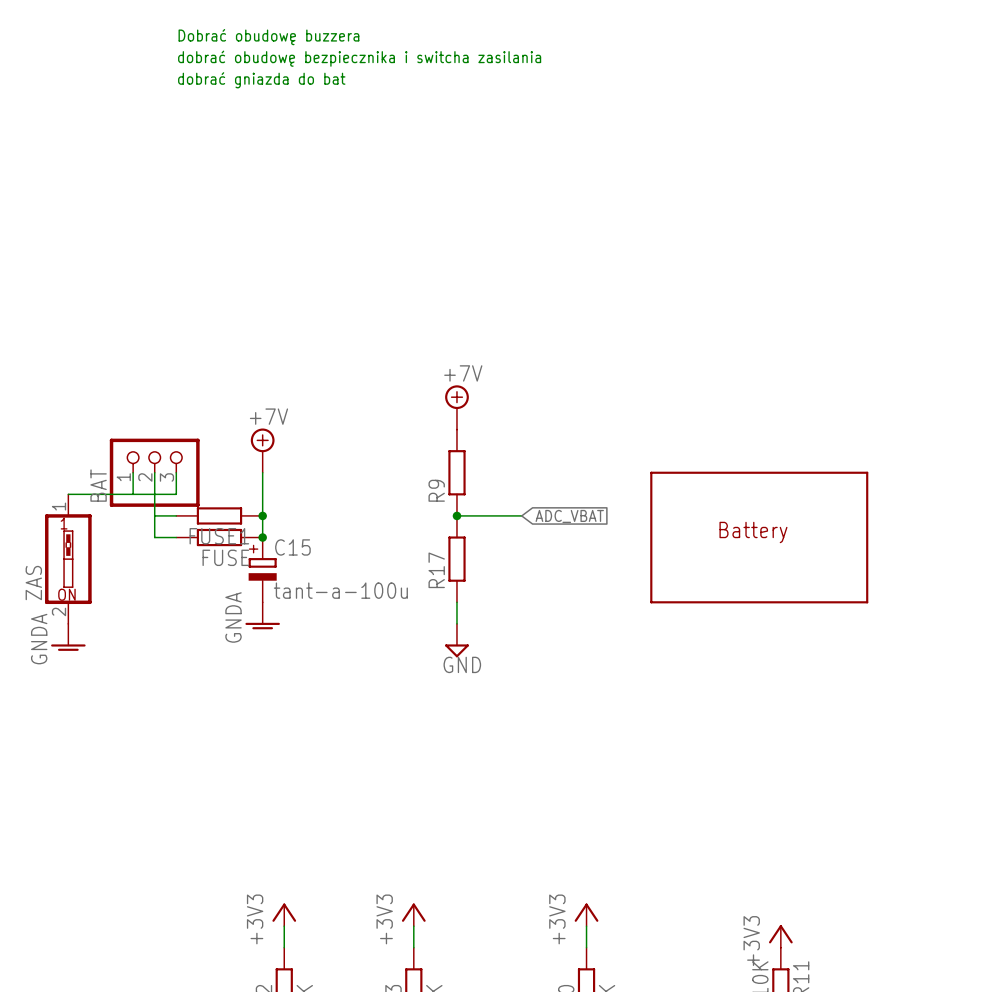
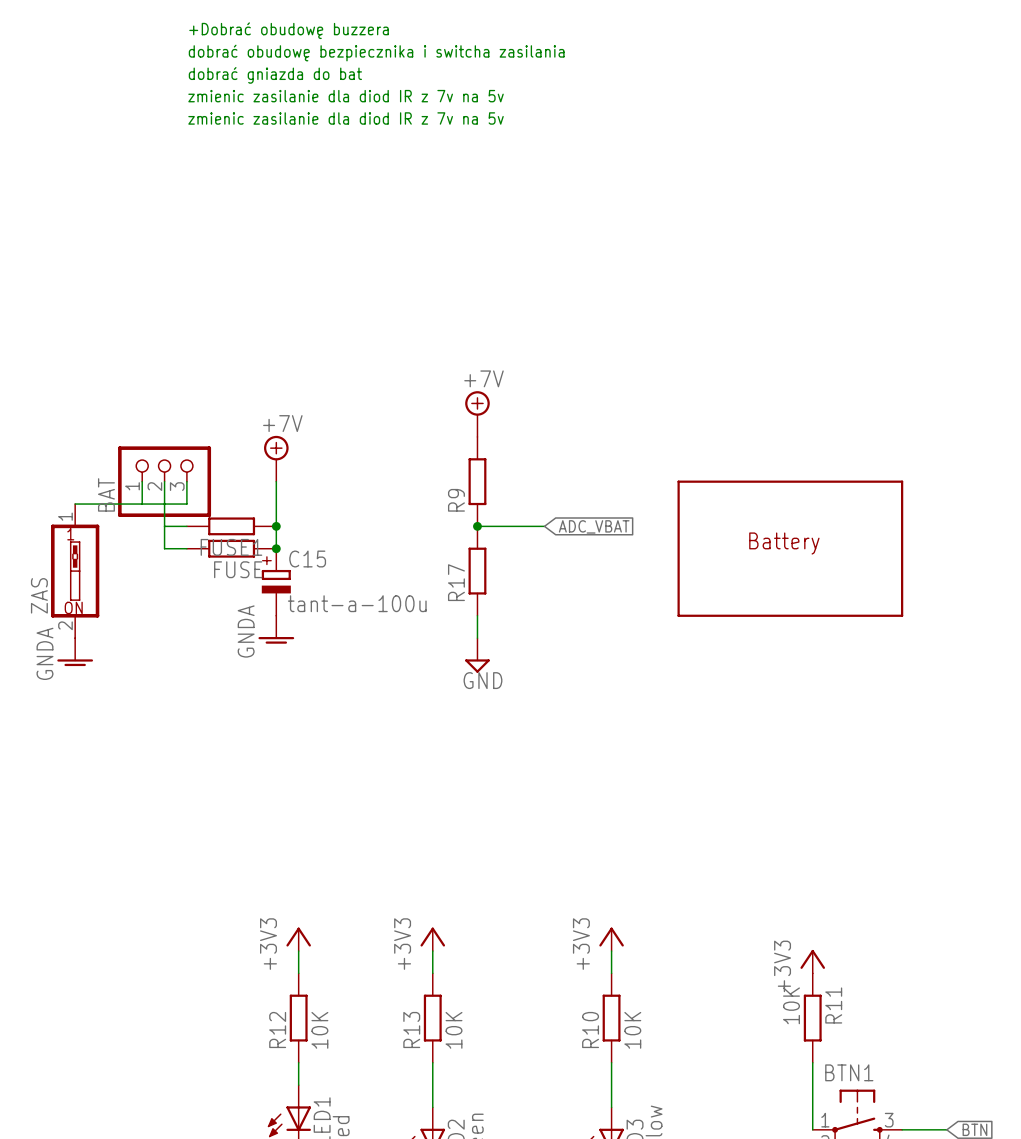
text: Dobrać obudowę buzzera (268, 37) -> +Dobrać obudowę buzzera (289, 30)
text: none -> zmienic zasilanie dla diod IR z 7v na 5v (346, 96)
text: none -> zmienic zasilanie dla diod IR z 7v na 5v (346, 118)

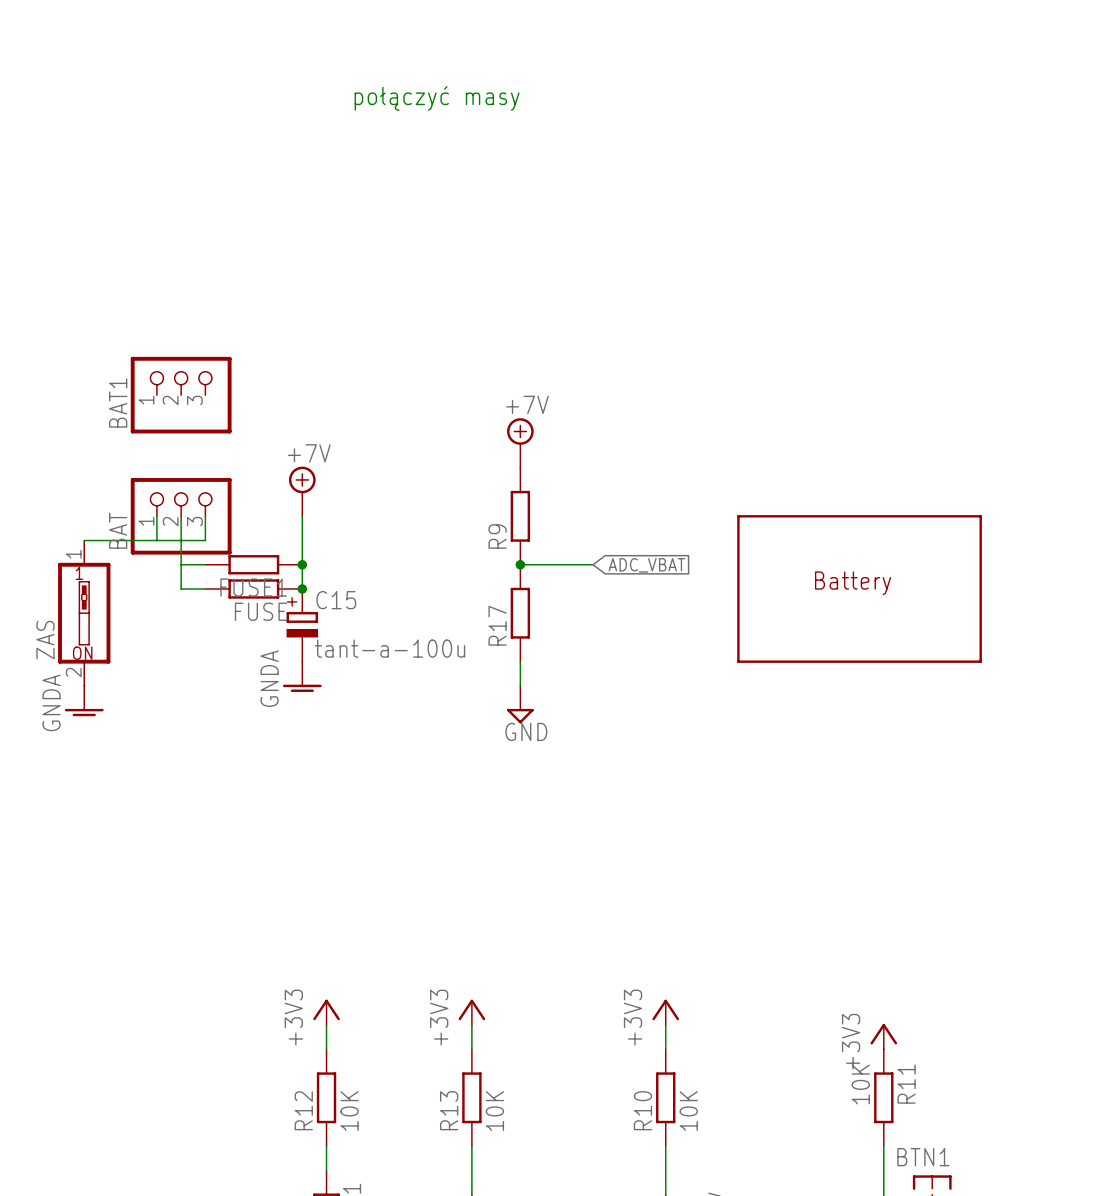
text: +Dobrać obudowę buzzera (289, 30) -> none
text: dobrać obudowę bezpiecznika i switcha zasilania (376, 53) -> none
text: dobrać gniazda do bat (275, 75) -> none
text: zmienic zasilanie dla diod IR z 7v na 5v (346, 96) -> none
text: none -> połączyć masy (437, 98)
text: zmienic zasilanie dla diod IR z 7v na 5v (346, 118) -> none
BAT1: none -> (181, 395)

